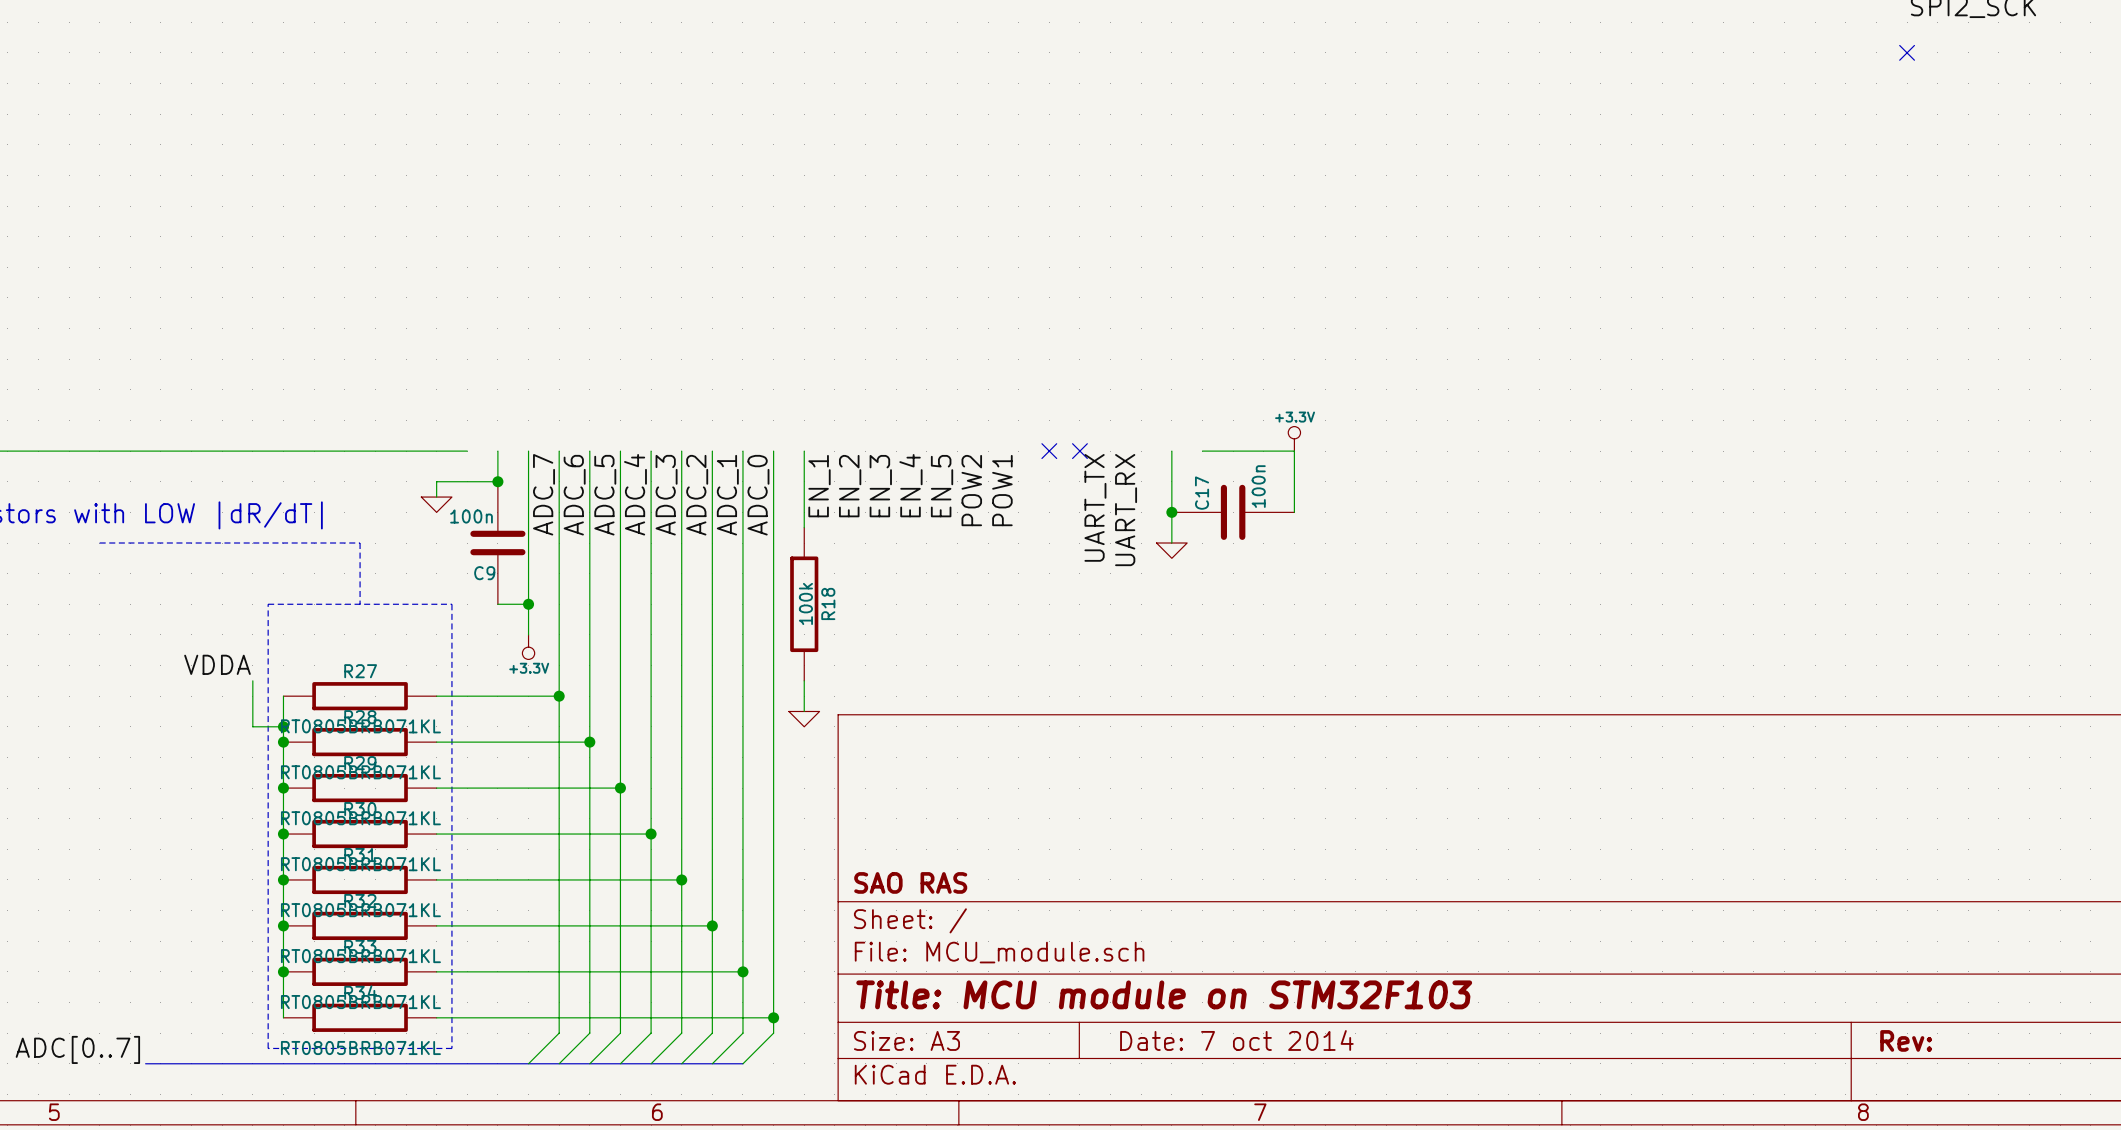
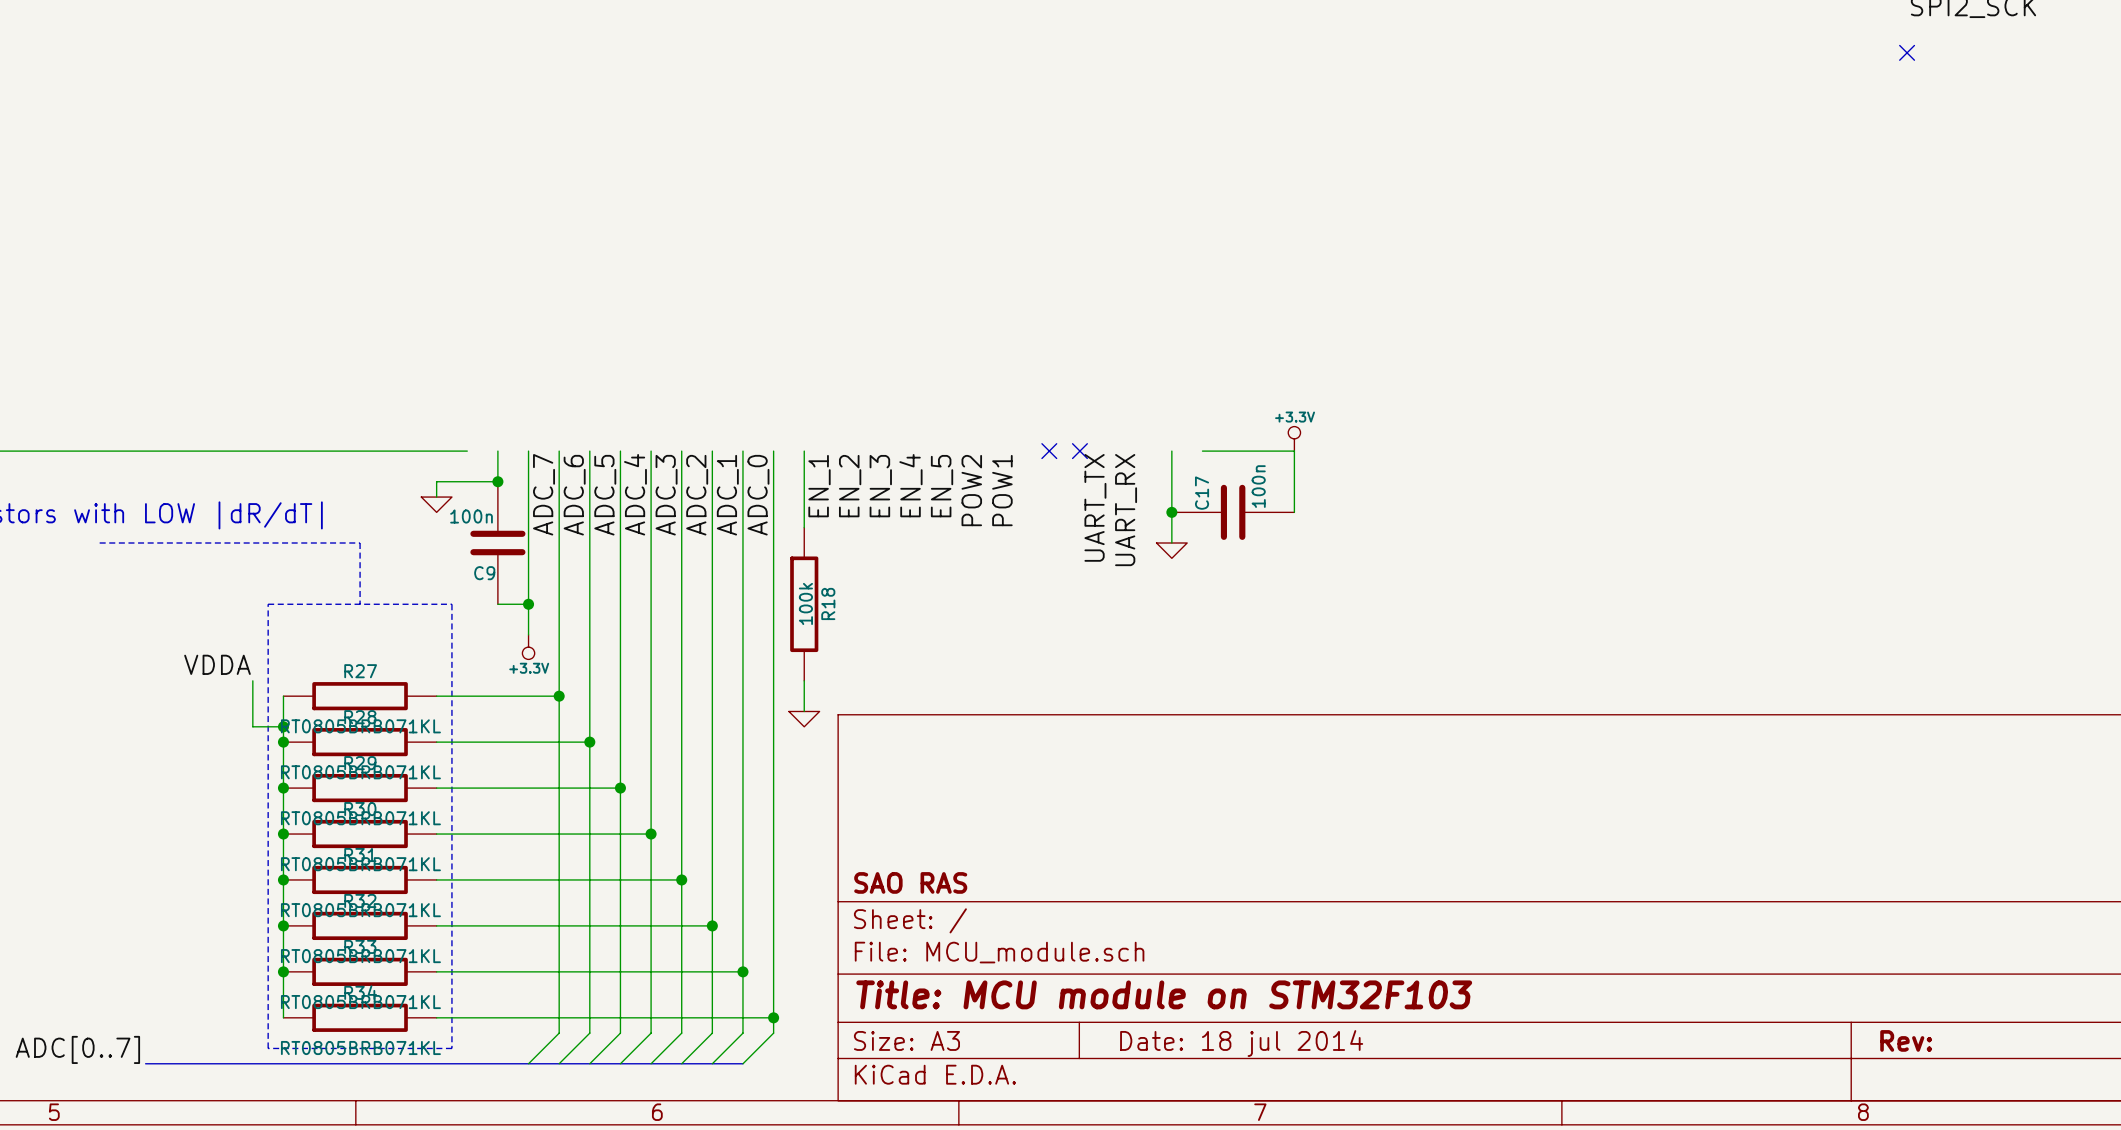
title block: Date: 7 oct 2014 (1236, 1040) -> Date: 18 jul 2014 (1241, 1043)

